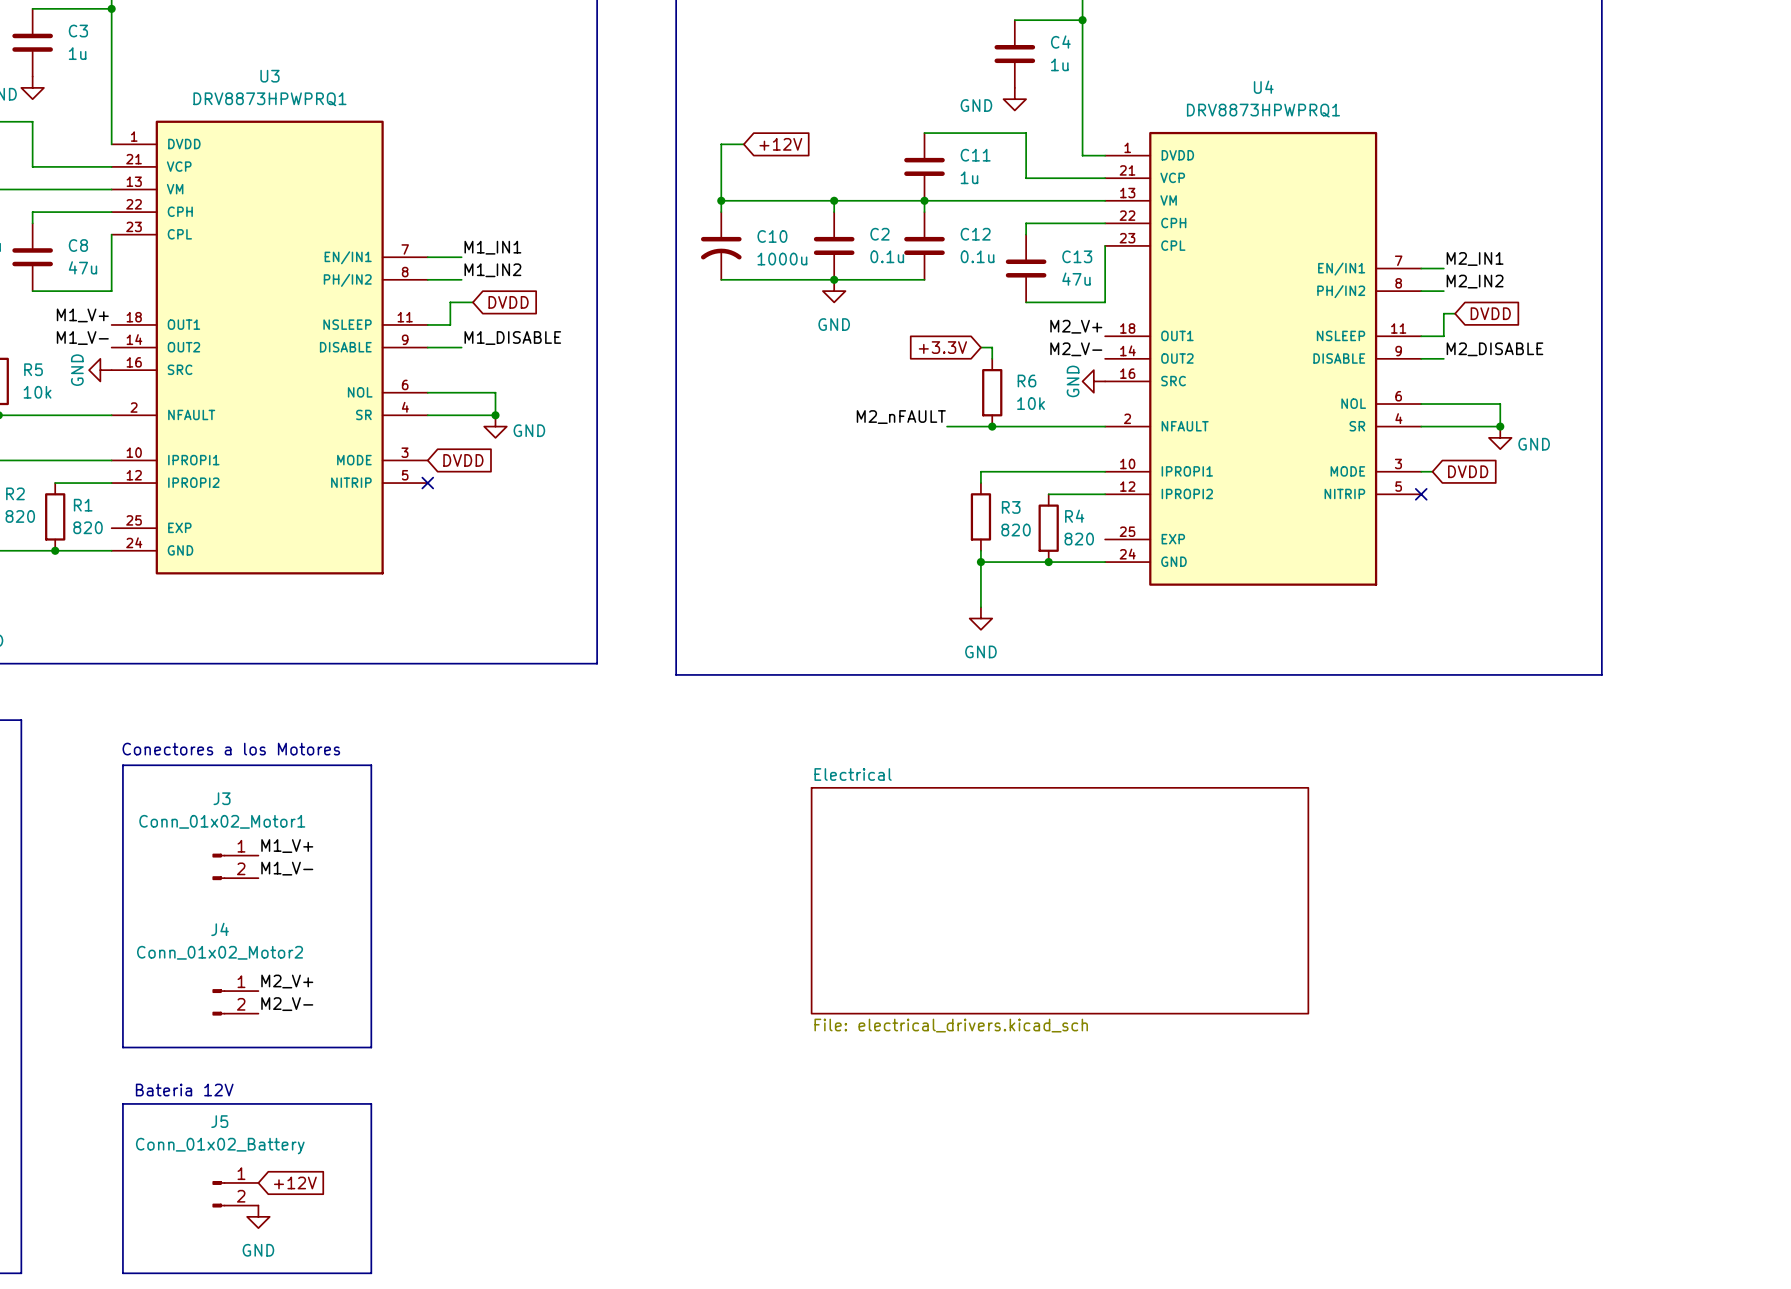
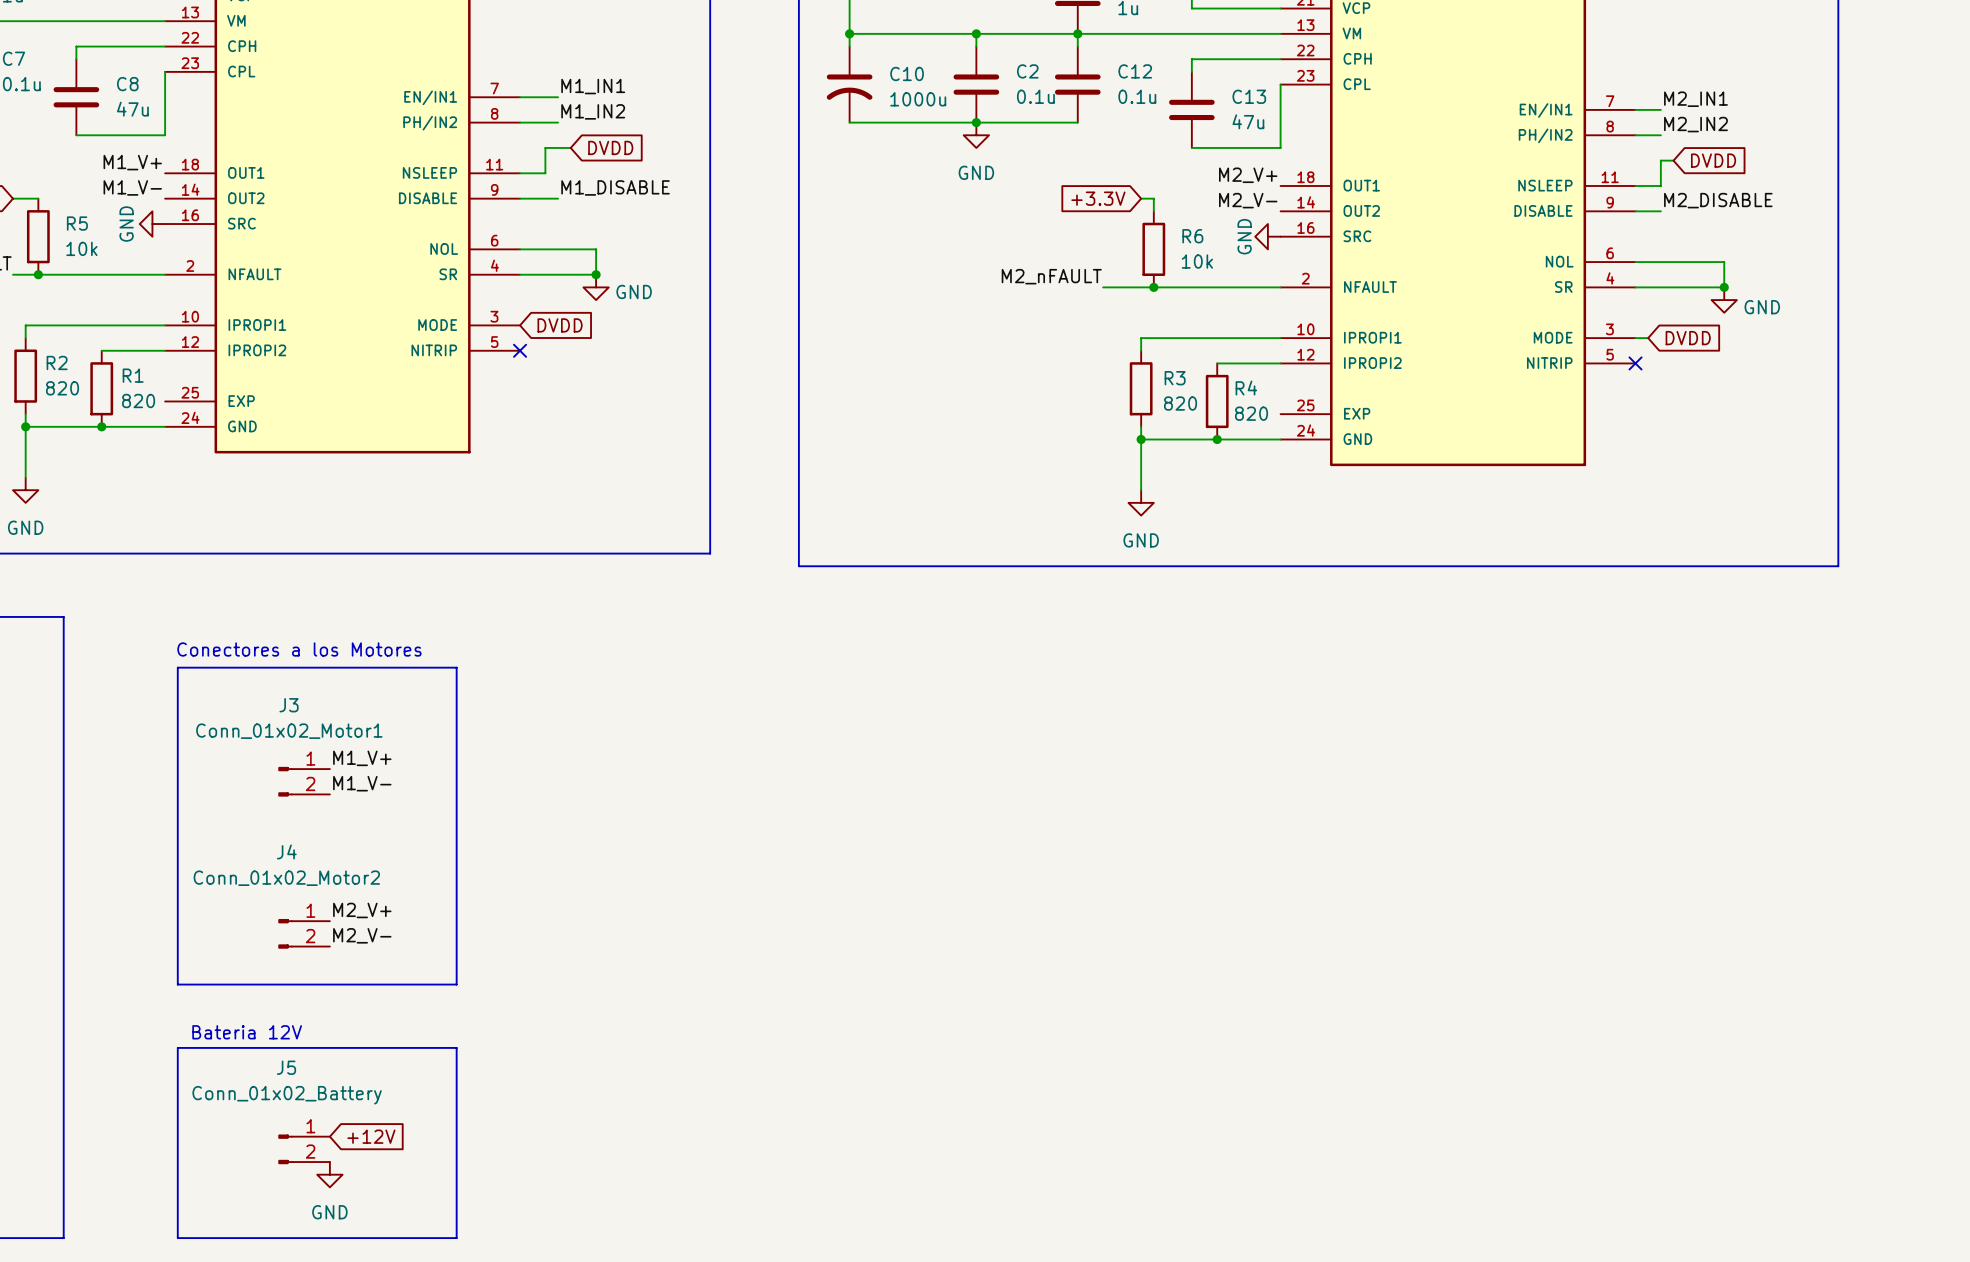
sheet Electrical: File: electrical_drivers.kicad_sch (1059, 900) -> none

